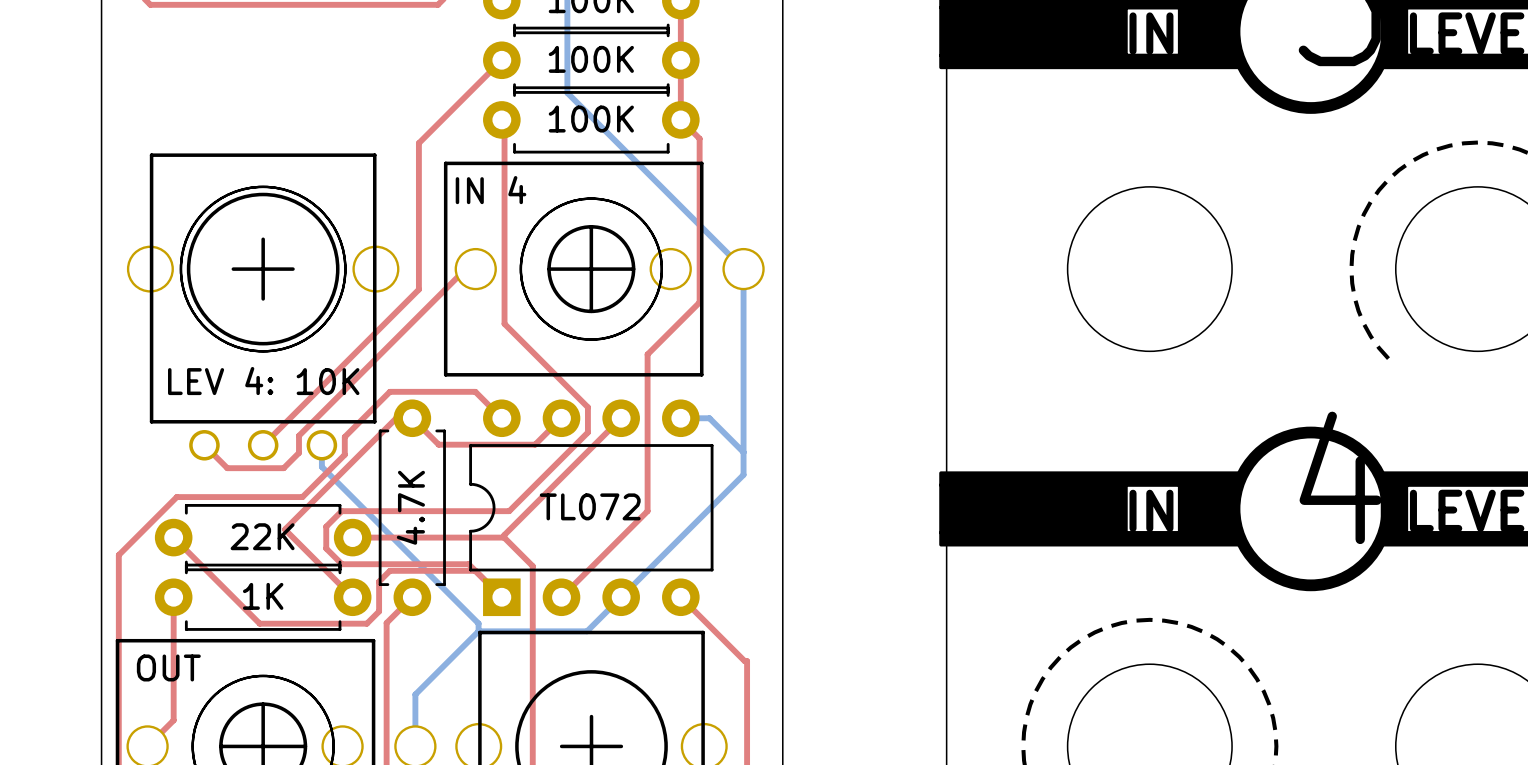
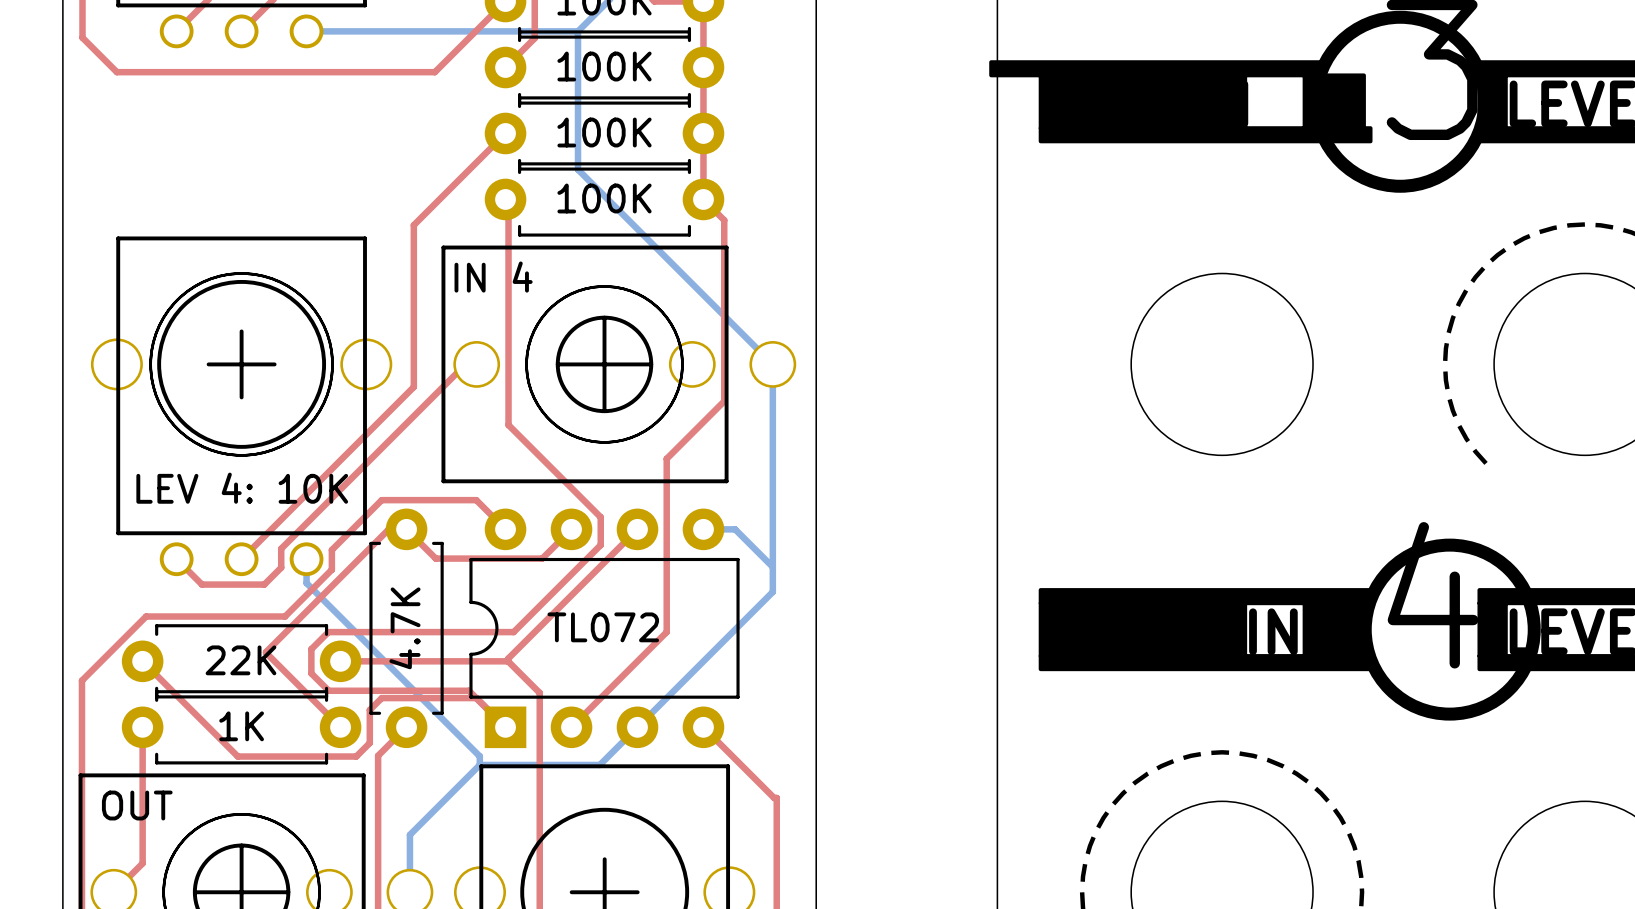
drawing position: (1033, 31) -> (1142, 101)
drawing position: (1206, 31) -> (1334, 101)
drawing position: (1090, 61) -> (1205, 134)
drawing: [939, 471, 1242, 487] -> none
drawing: none -> [1038, 588, 1373, 606]
drawing position: (1033, 508) -> (1142, 629)
drawing position: (1206, 508) -> (1334, 629)
drawing position: (1310, 508) -> (1449, 629)
text position: IN (1151, 510) -> IN (1273, 631)
drawing: [939, 531, 1242, 547] -> none
drawing: none -> [1038, 654, 1373, 672]

